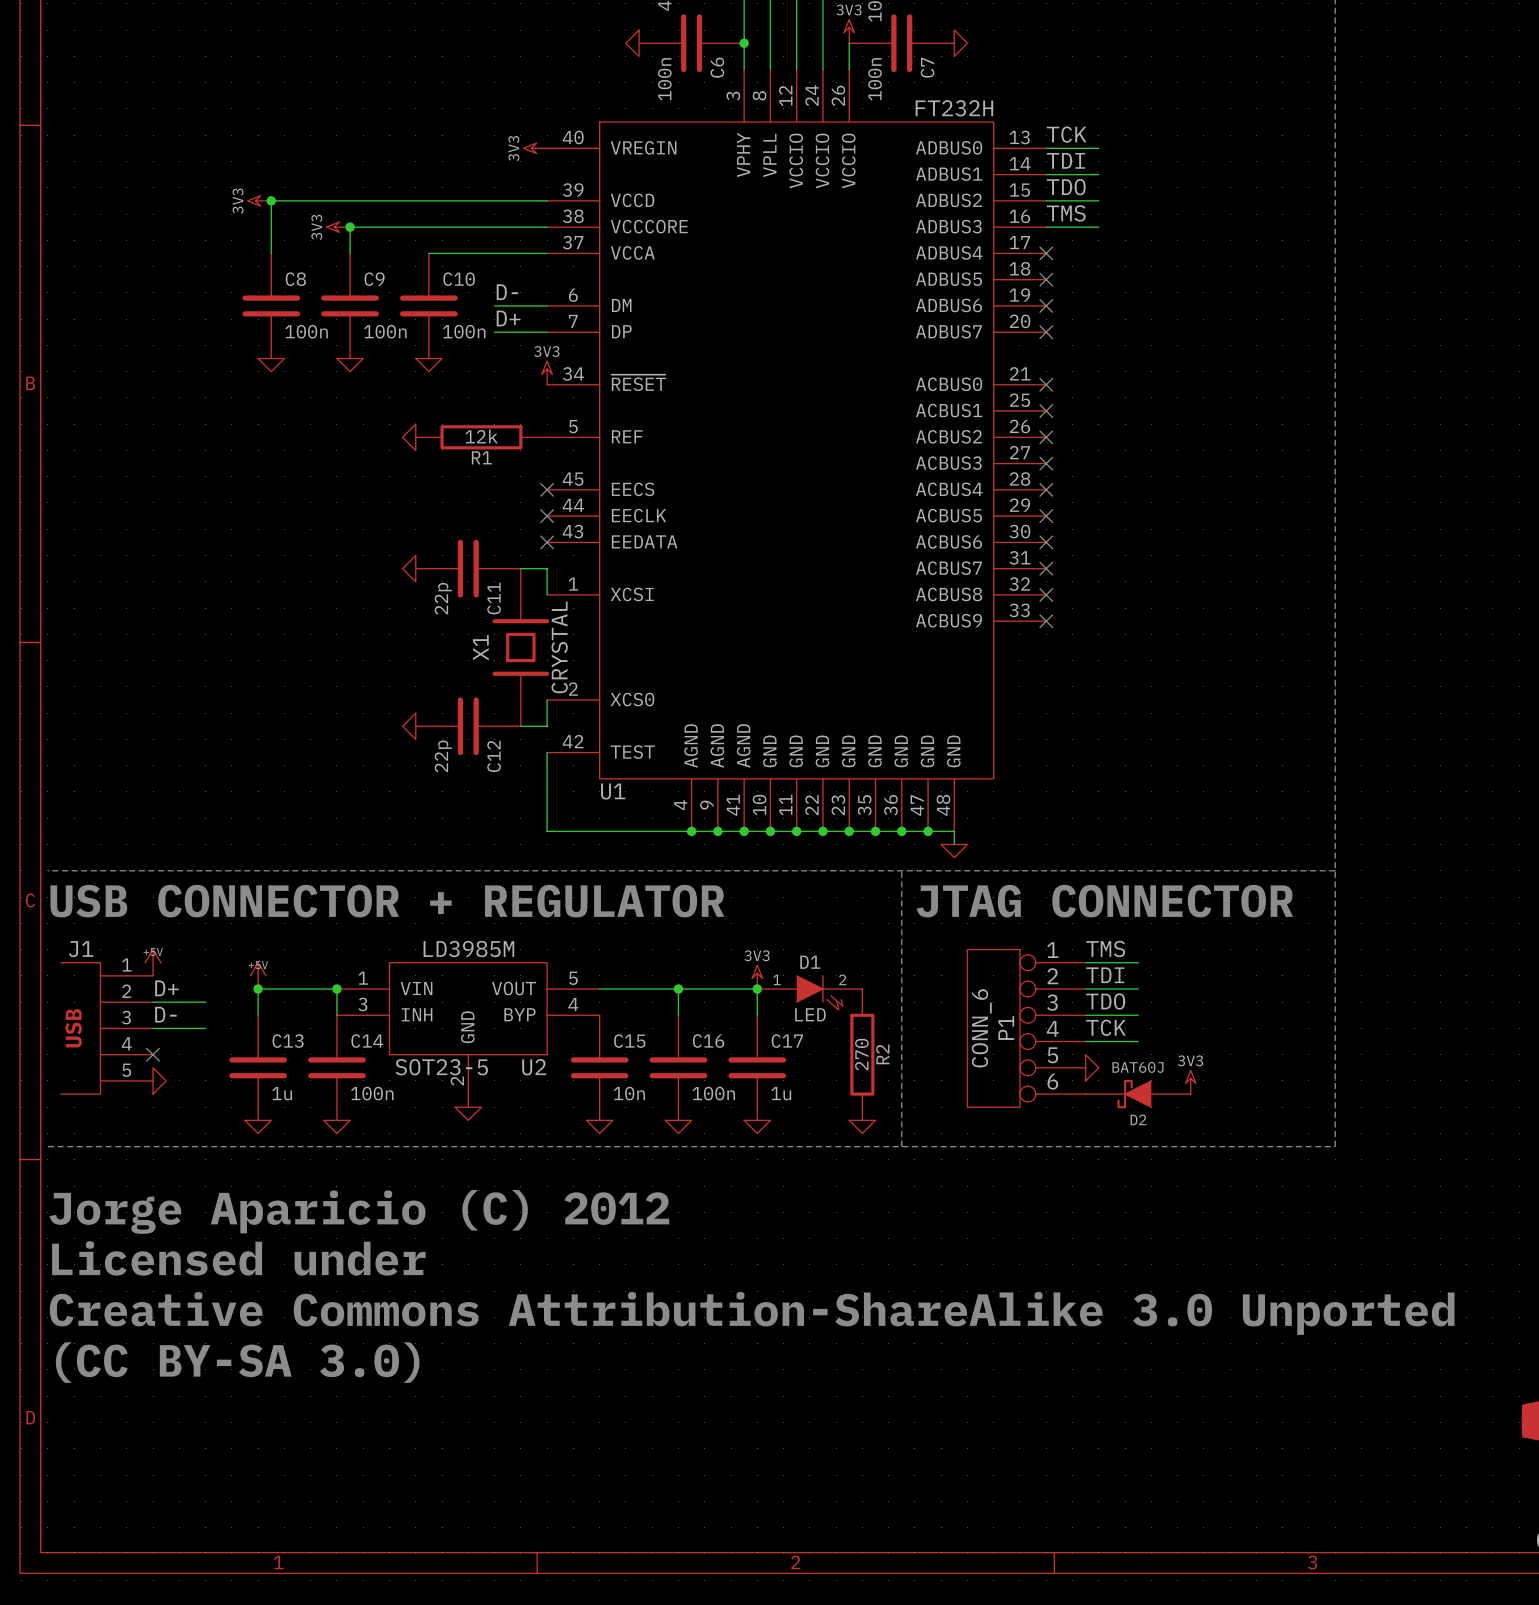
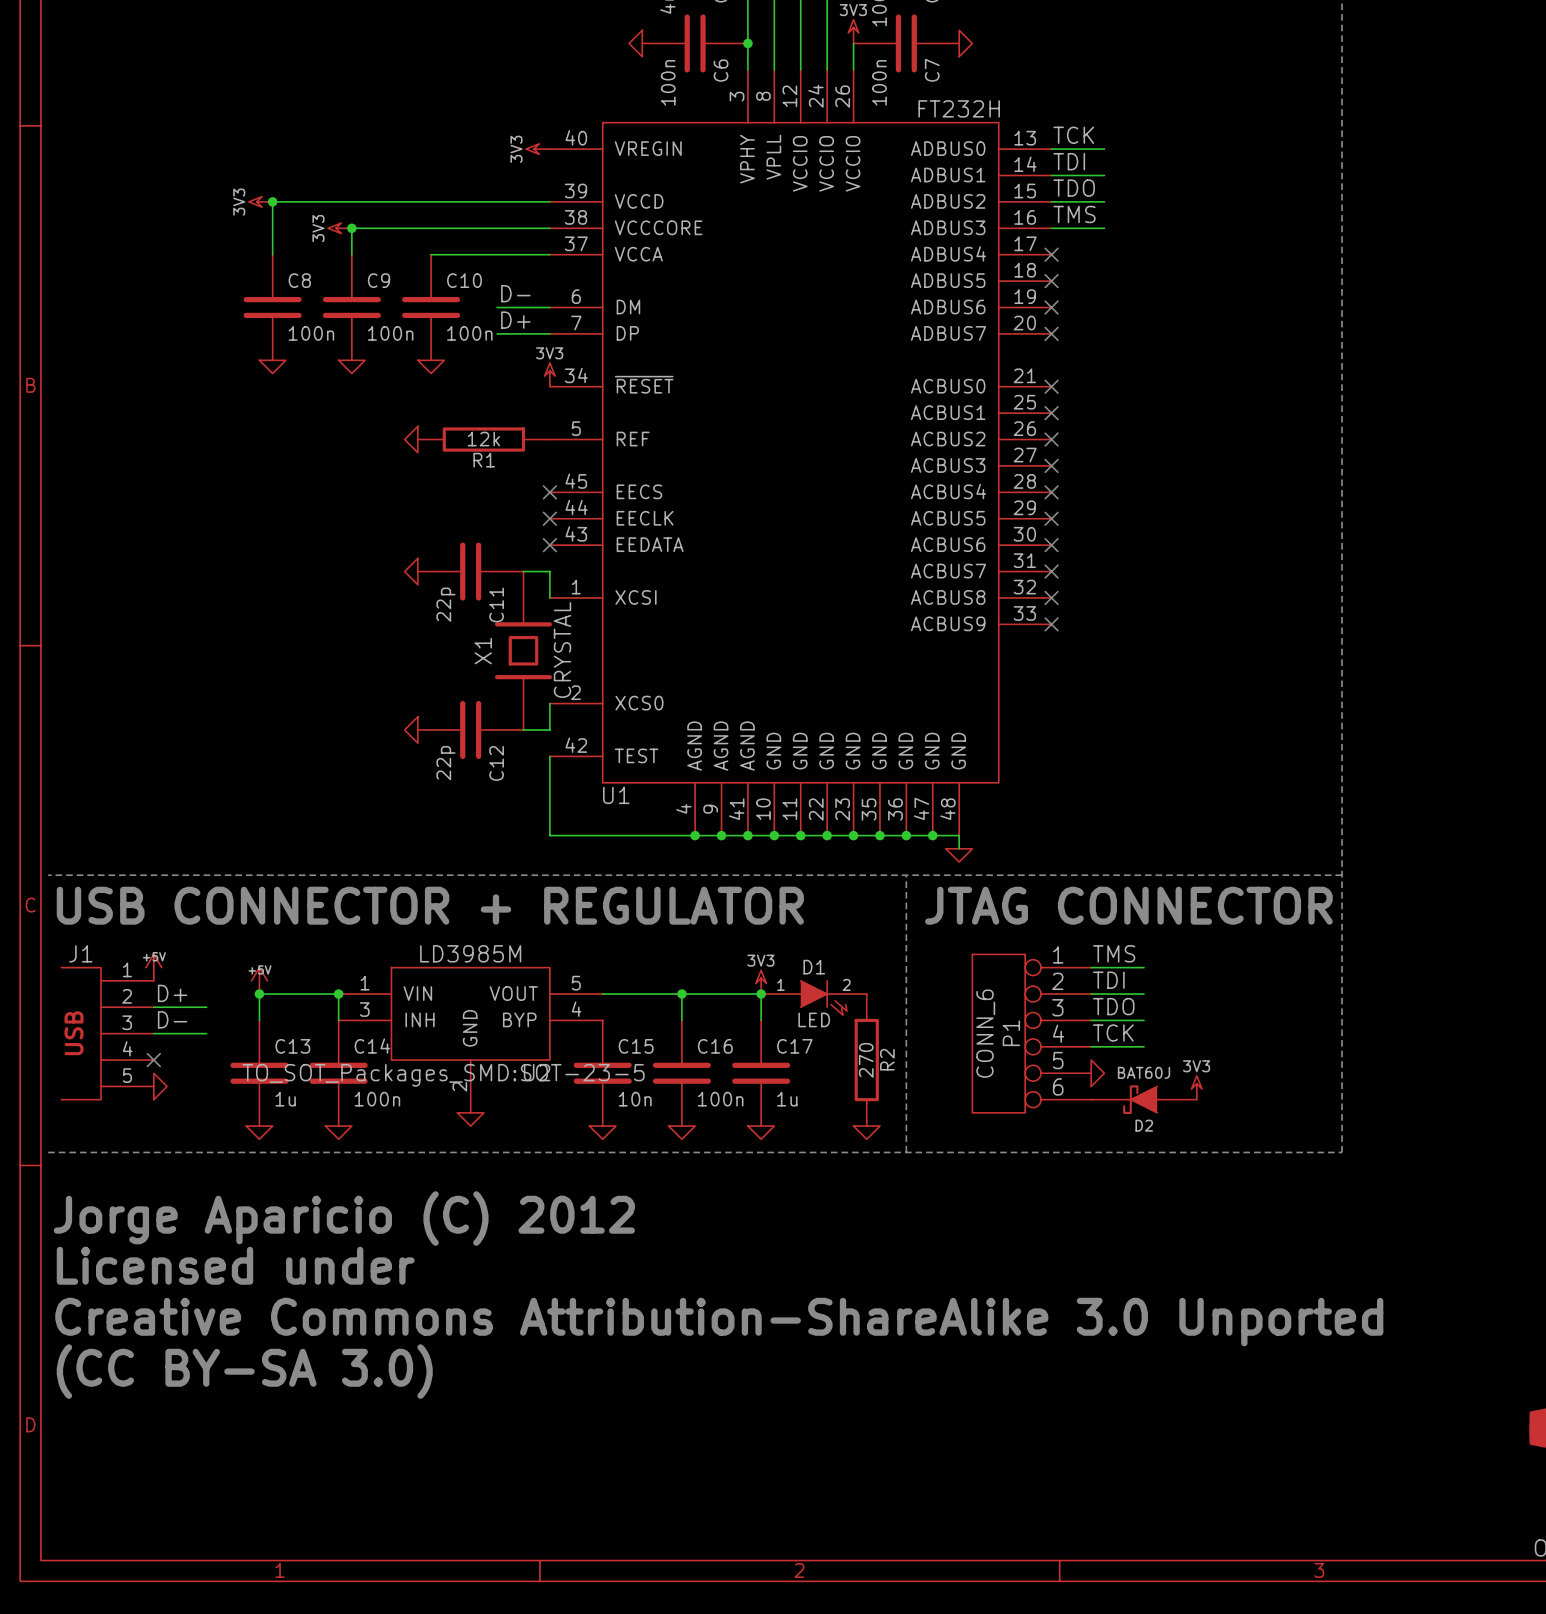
U2 text: SOT23-5 (441, 1067) -> TO_SOT_Packages_SMD:SOT-23-5 (443, 1075)

